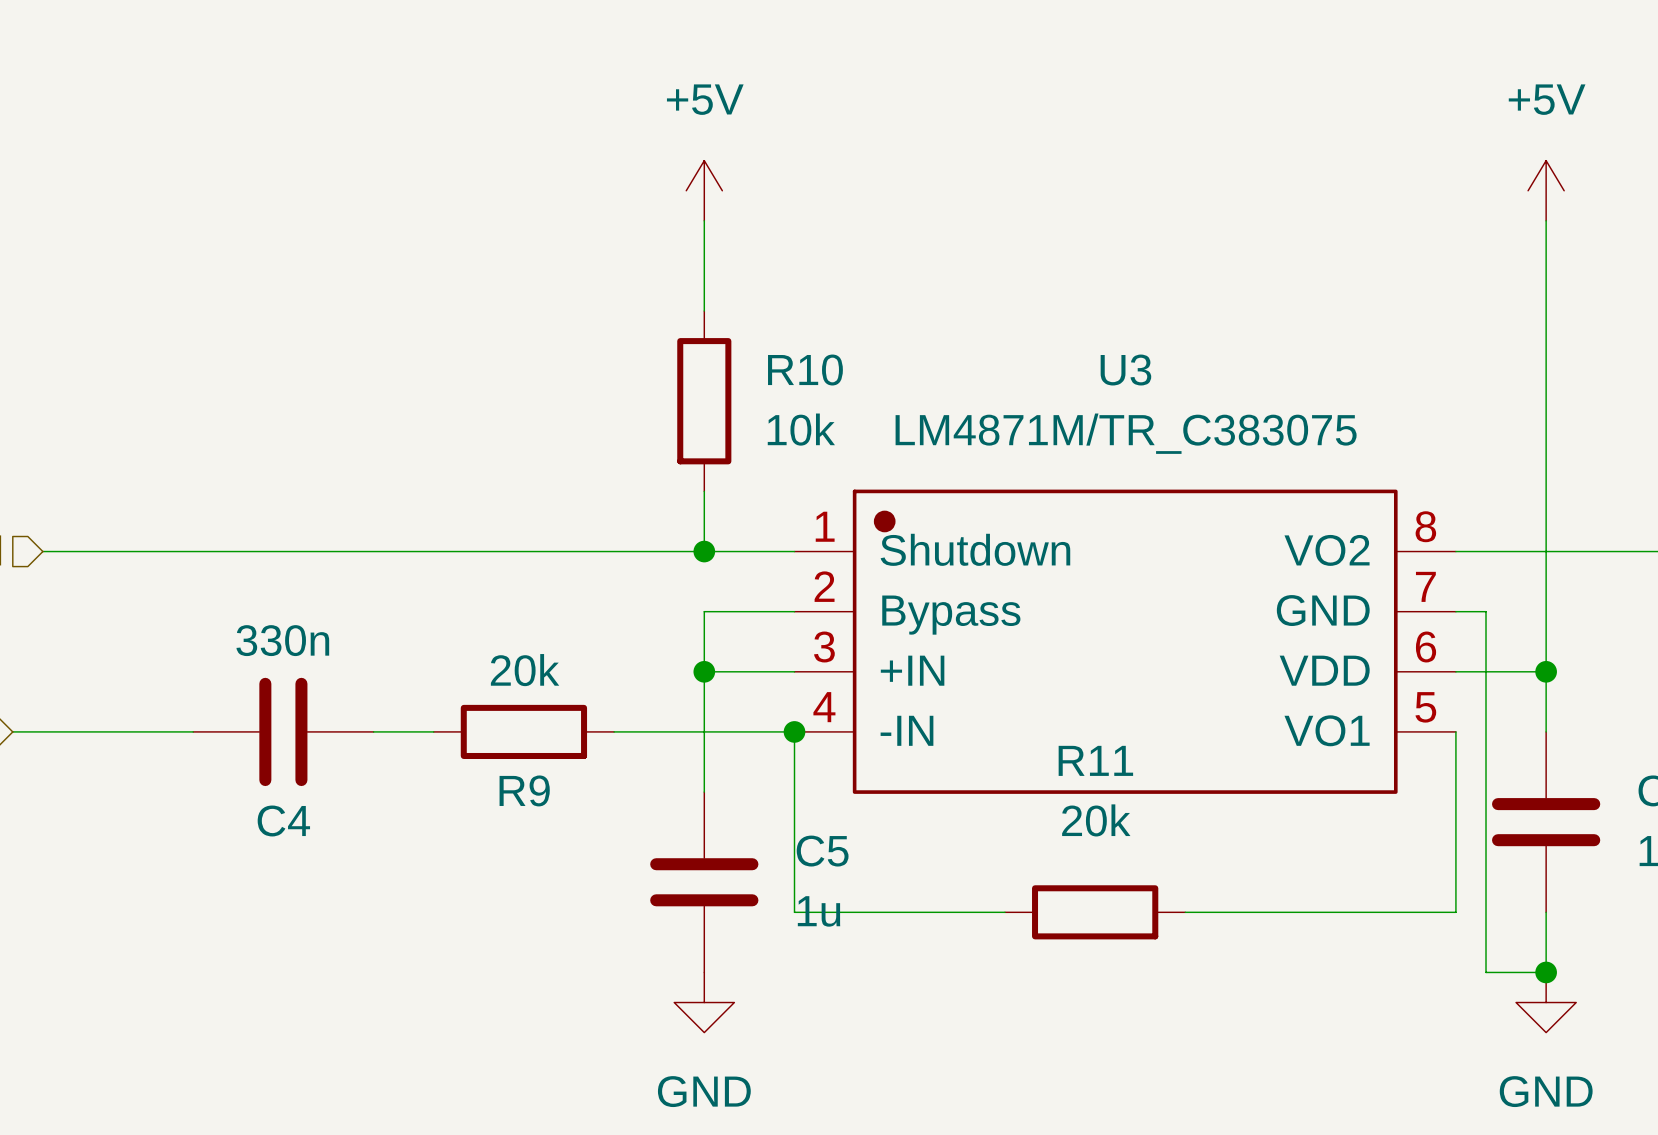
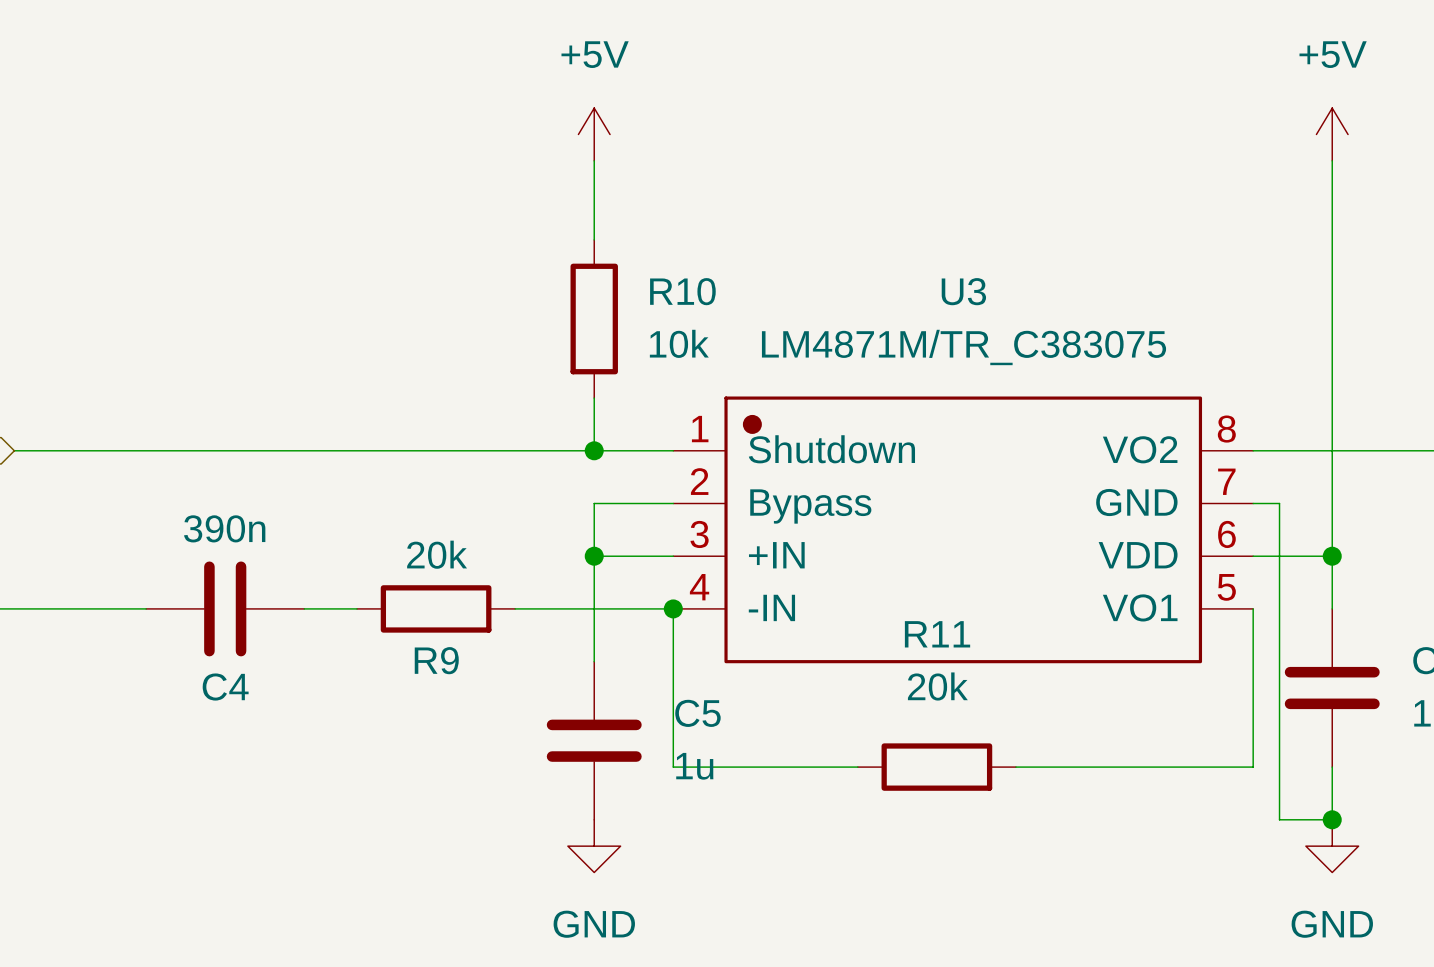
C4 value: 330n (282, 640) -> 390n (224, 528)

